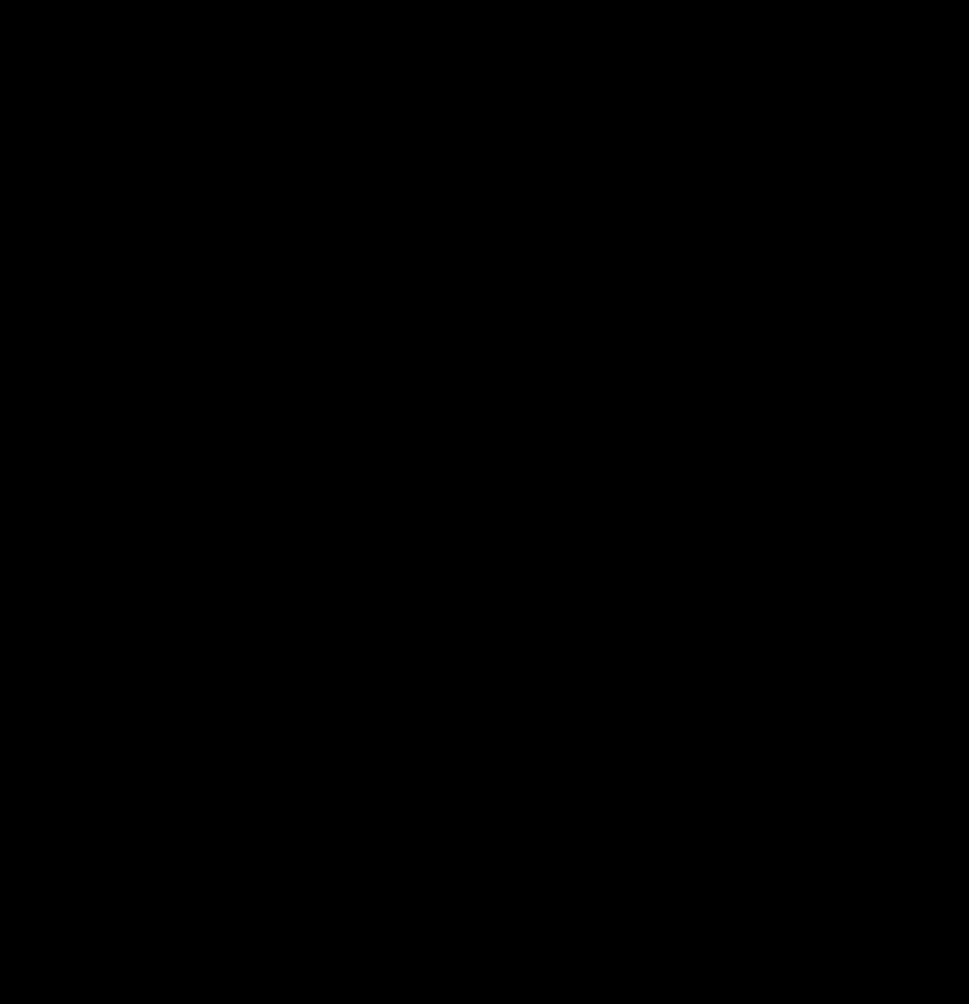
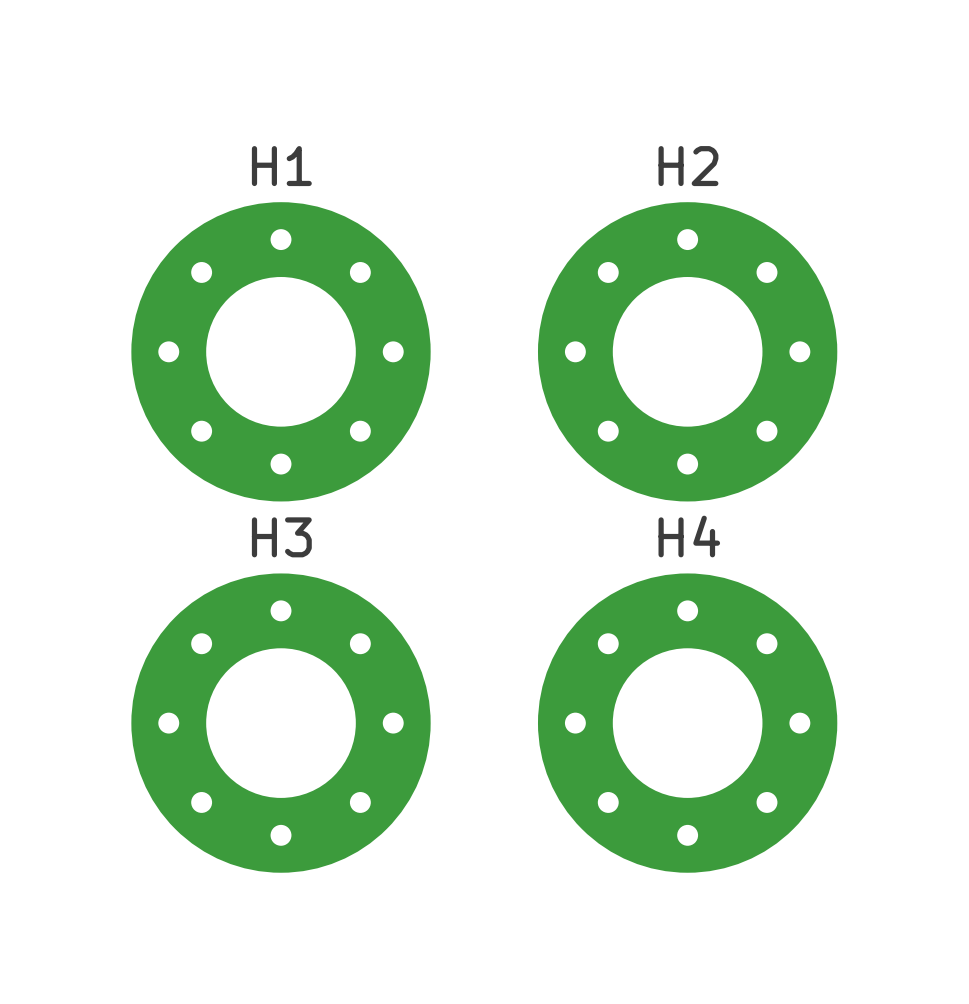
H1: none -> (281, 351)
H2: none -> (687, 351)
H3: none -> (281, 723)
H4: none -> (687, 723)

